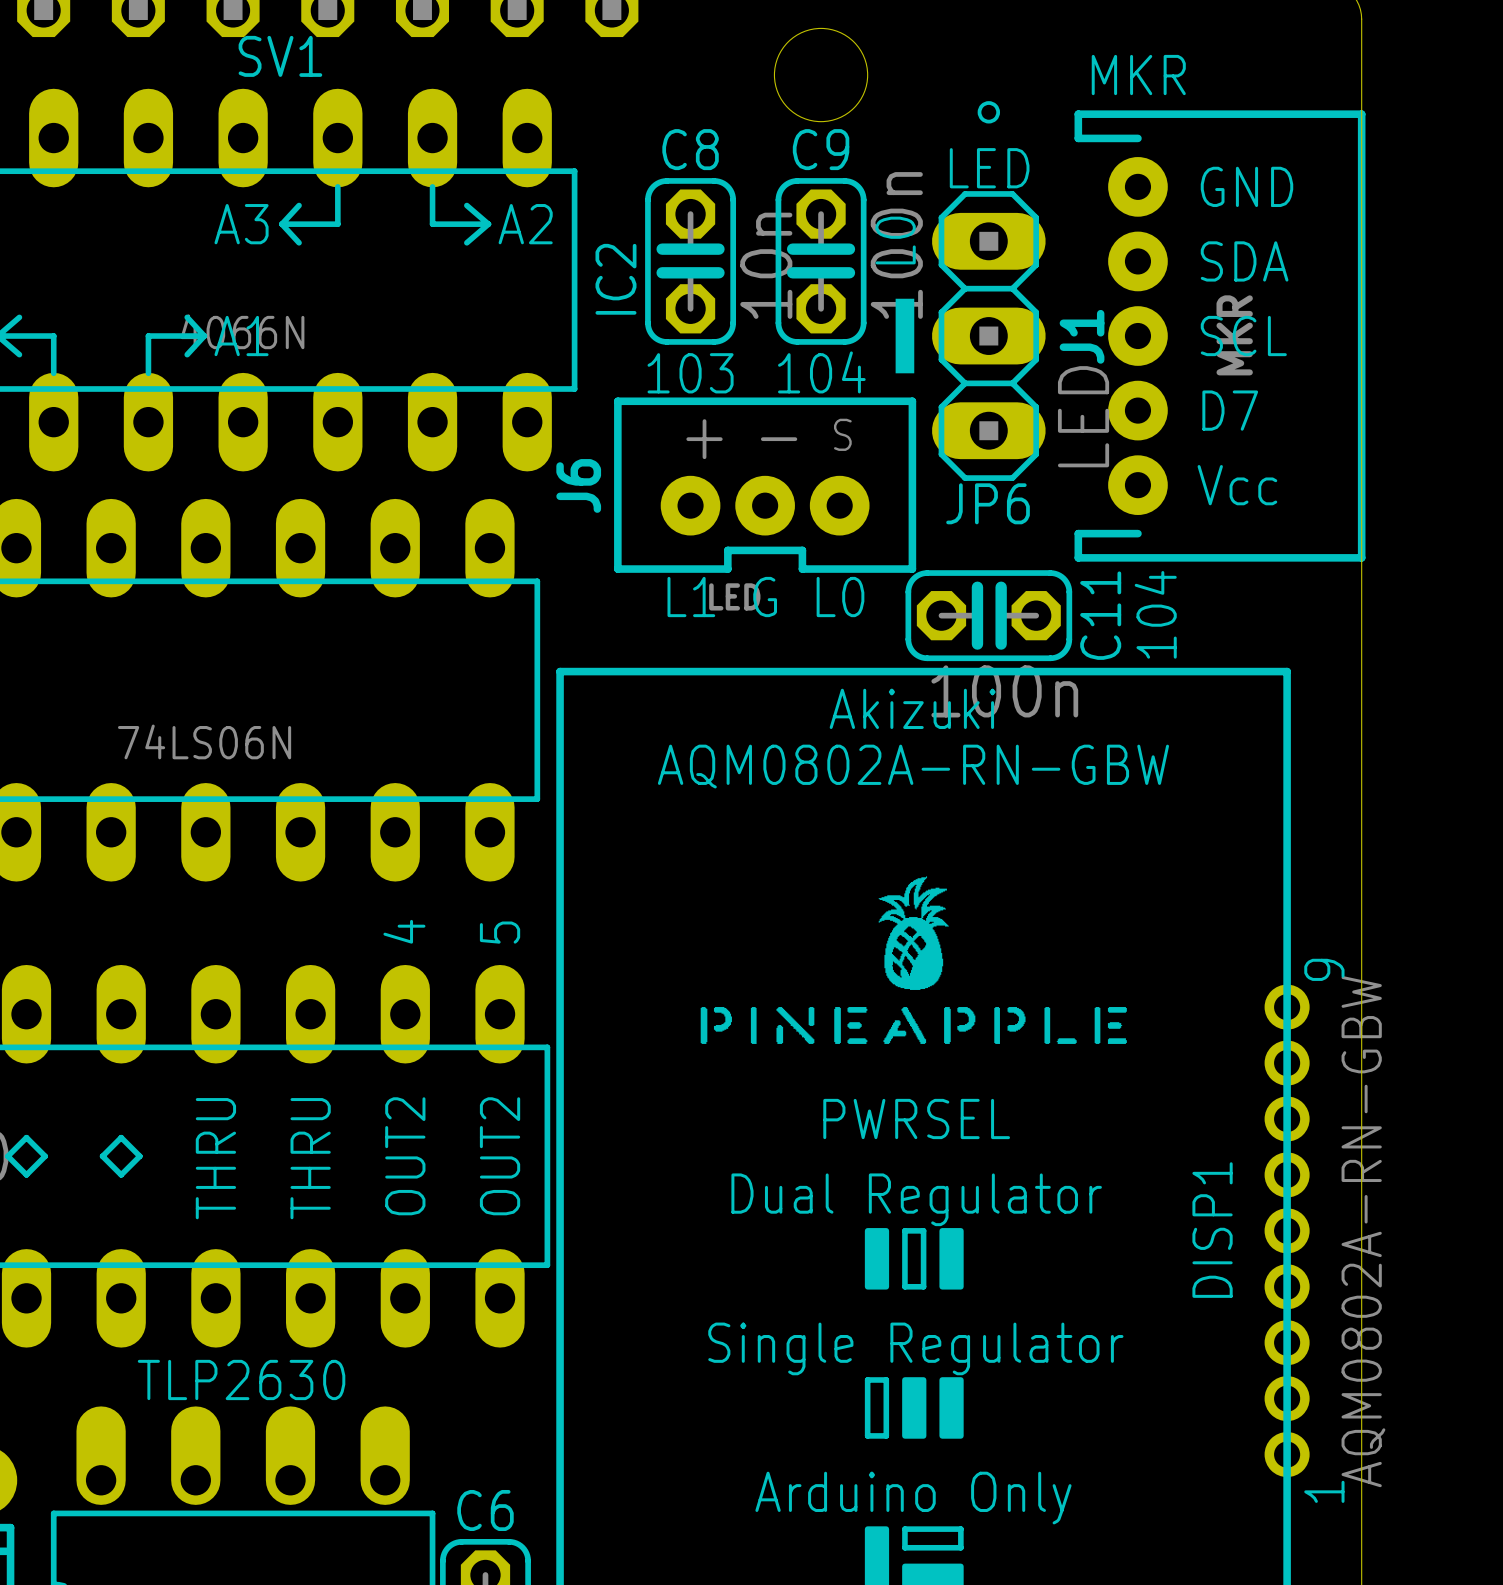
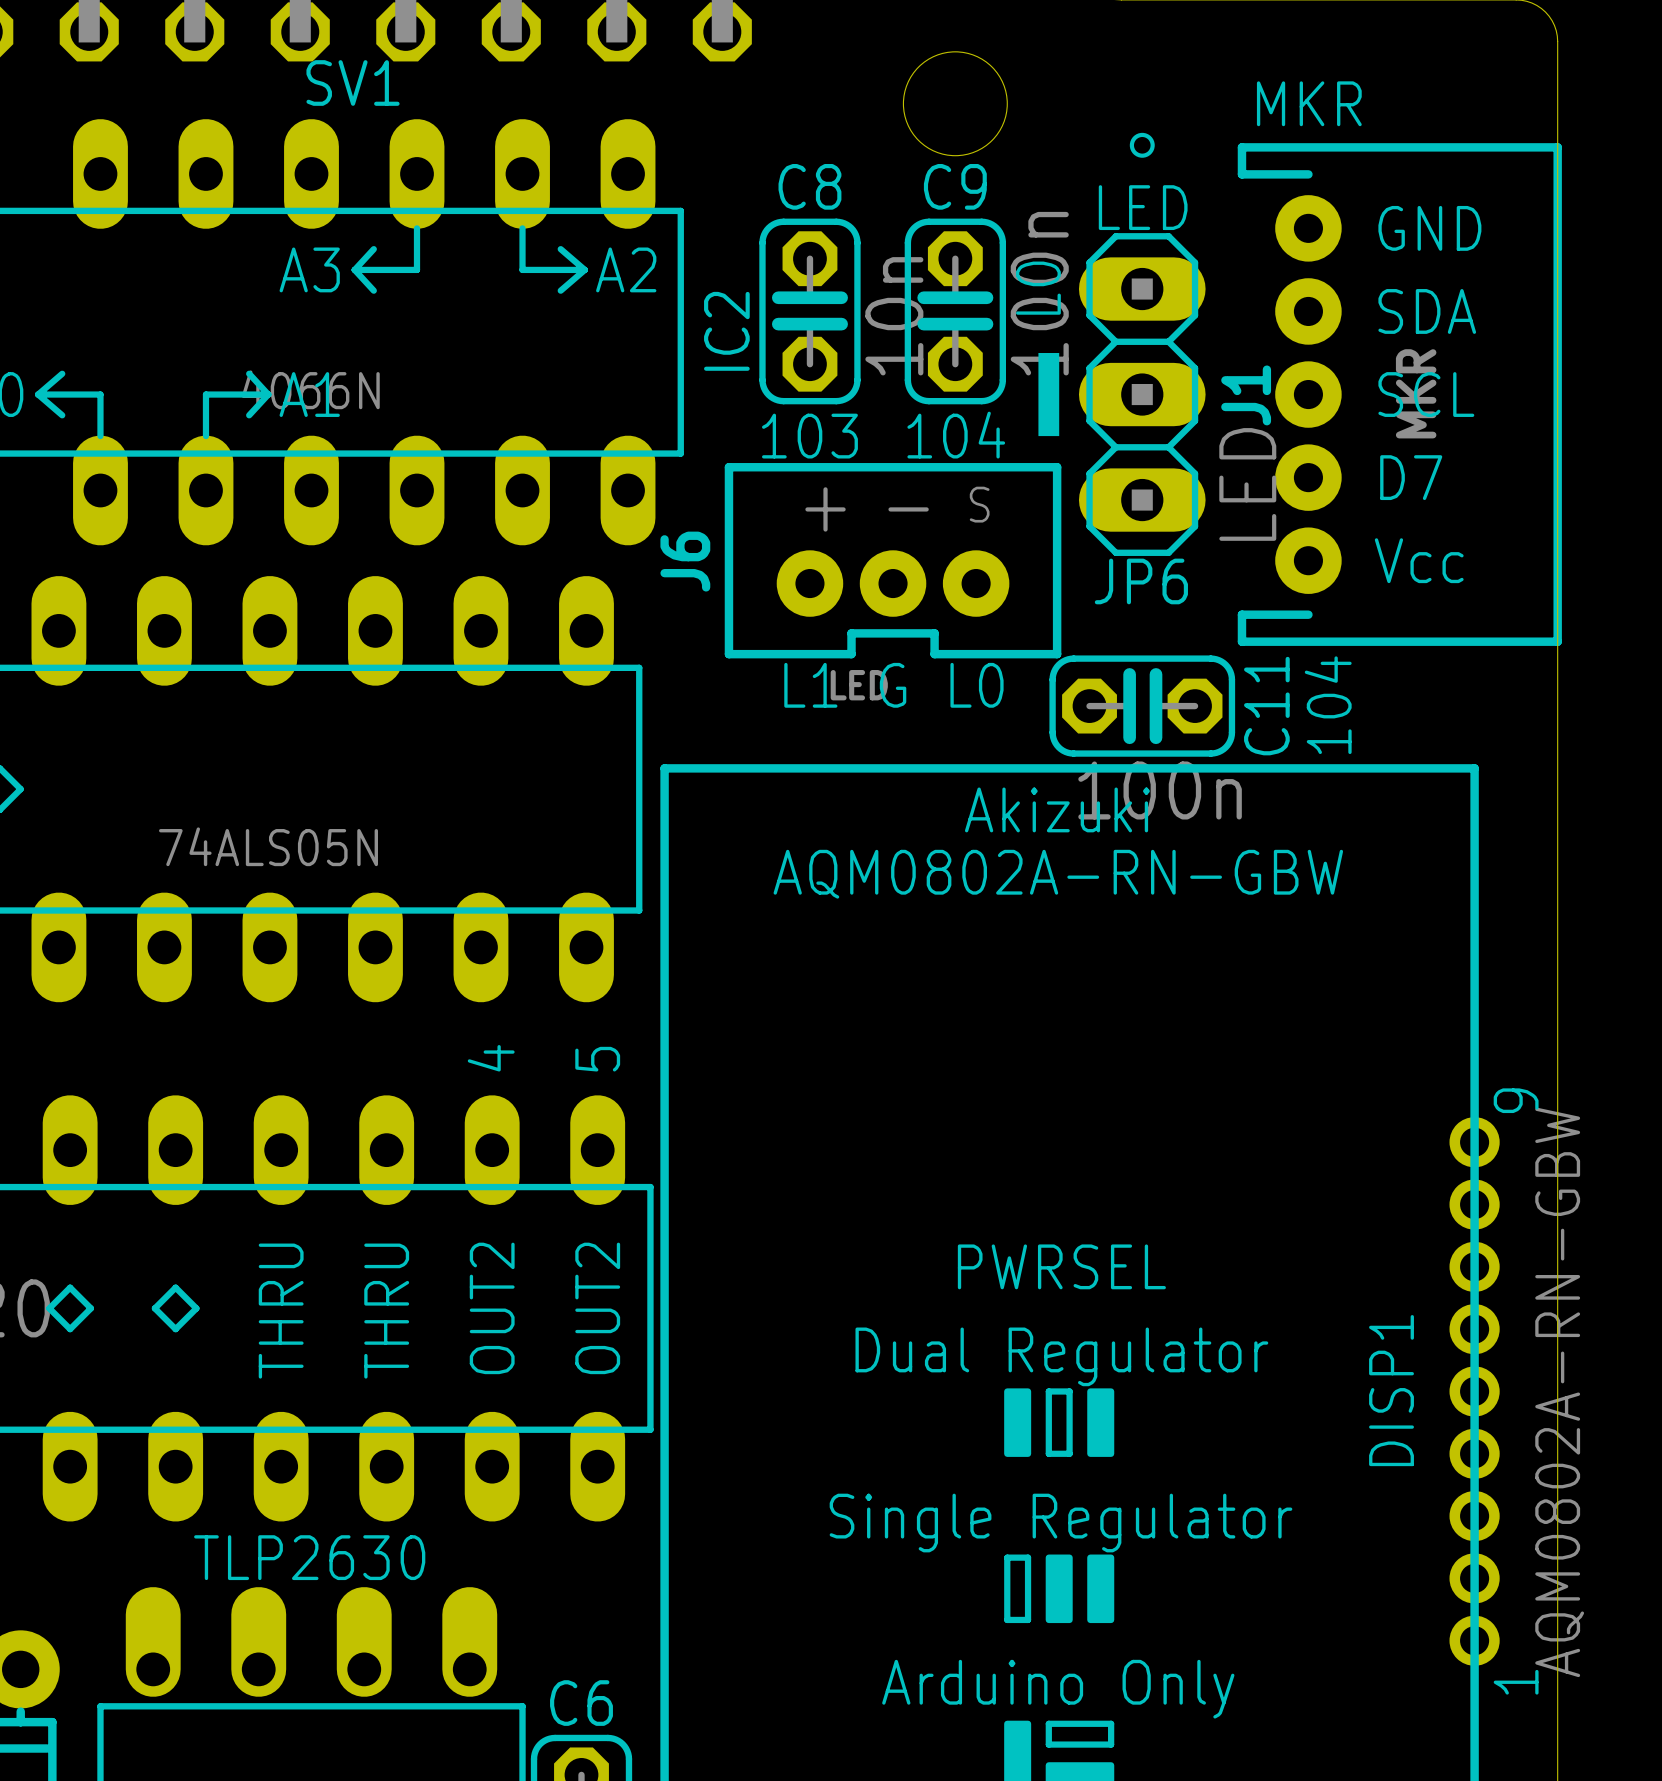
part value: 74LS06N (204, 741) -> 74ALS05N (268, 846)
drawing: [700, 876, 1127, 1044] -> none

